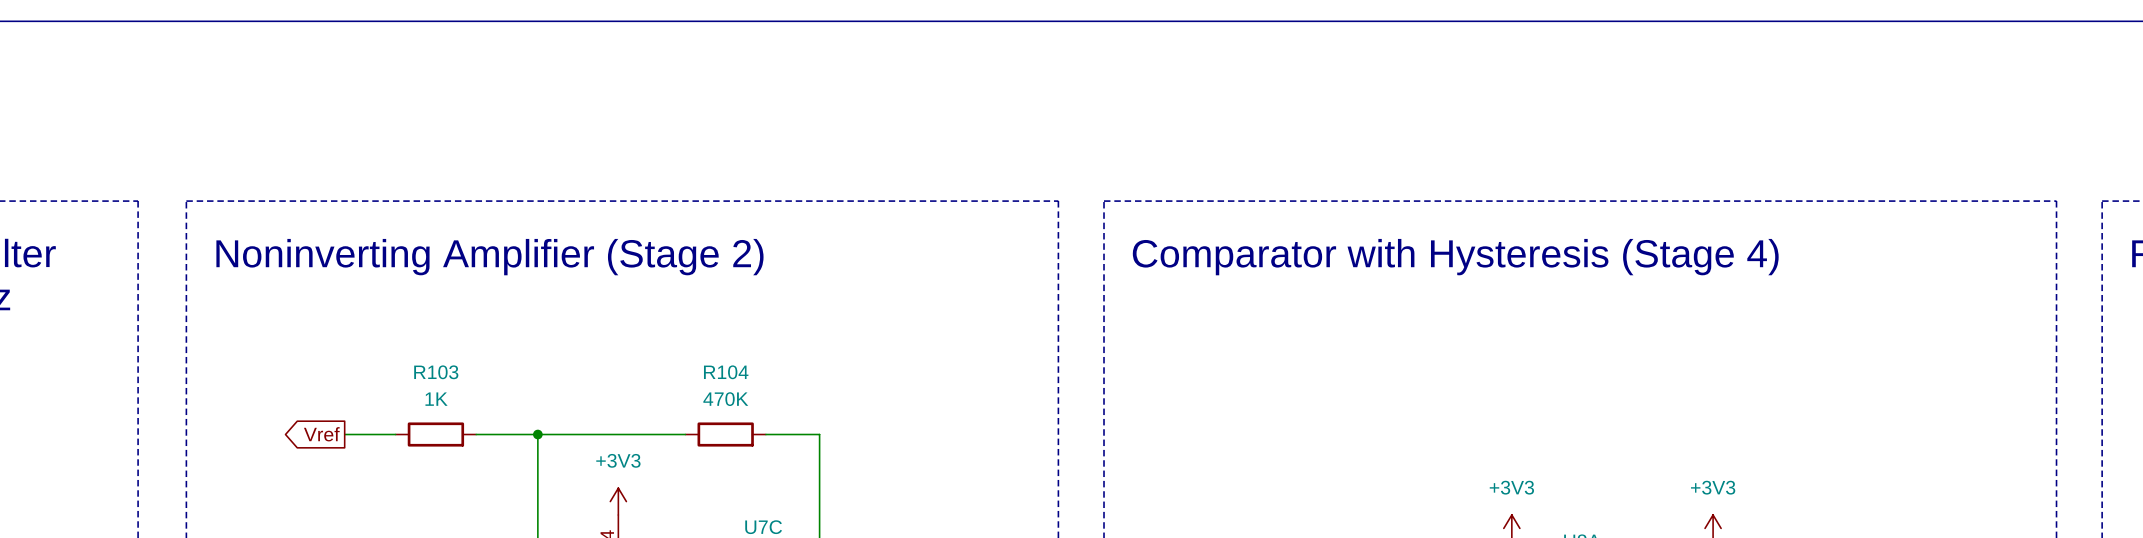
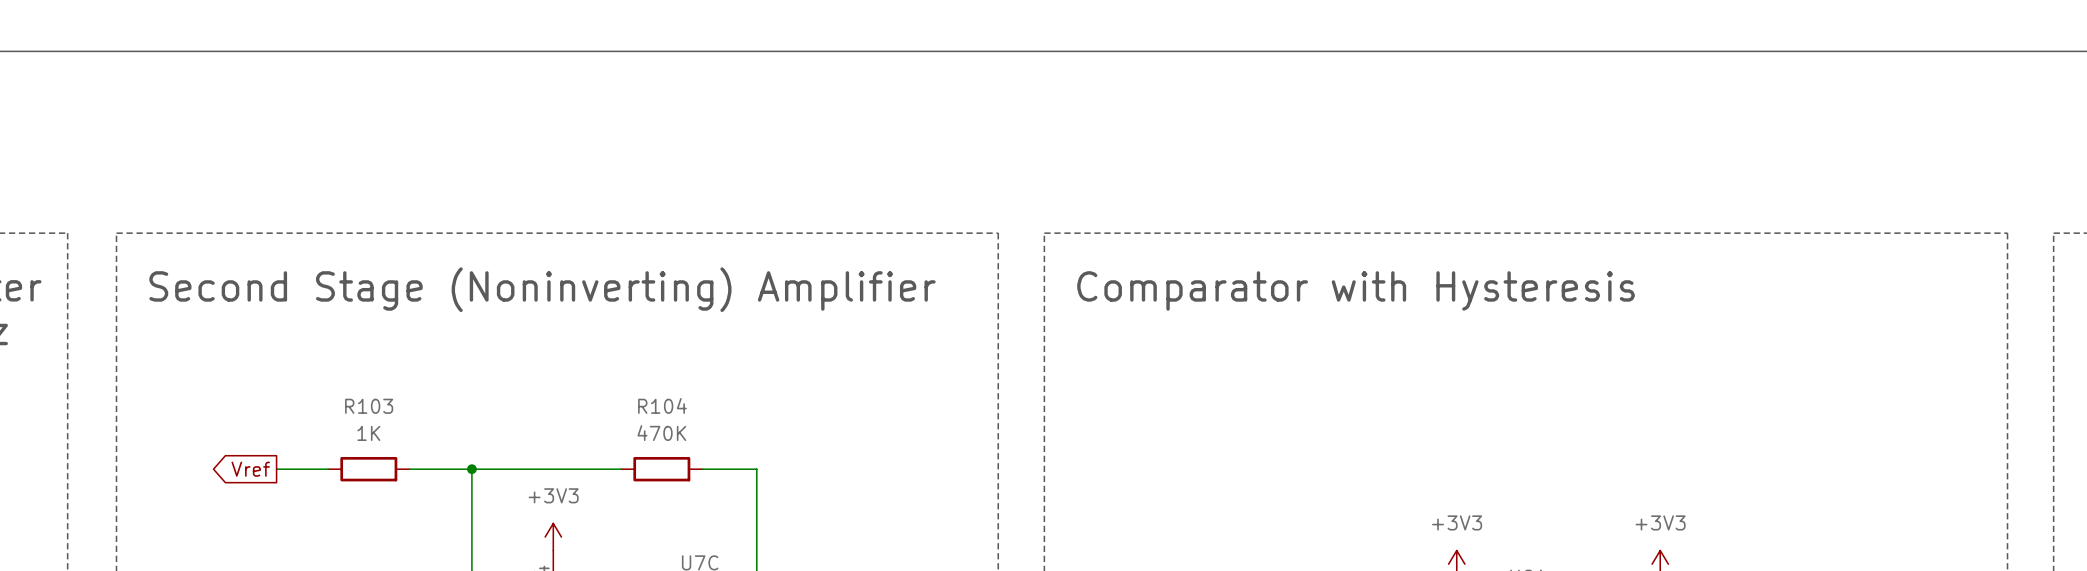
text: Noninverting Amplifier (Stage 2) (489, 257) -> Second Stage (Noninverting) Amplifier (542, 289)
text: Comparator with Hysteresis (Stage 4) (1455, 257) -> Comparator with Hysteresis (1356, 290)

